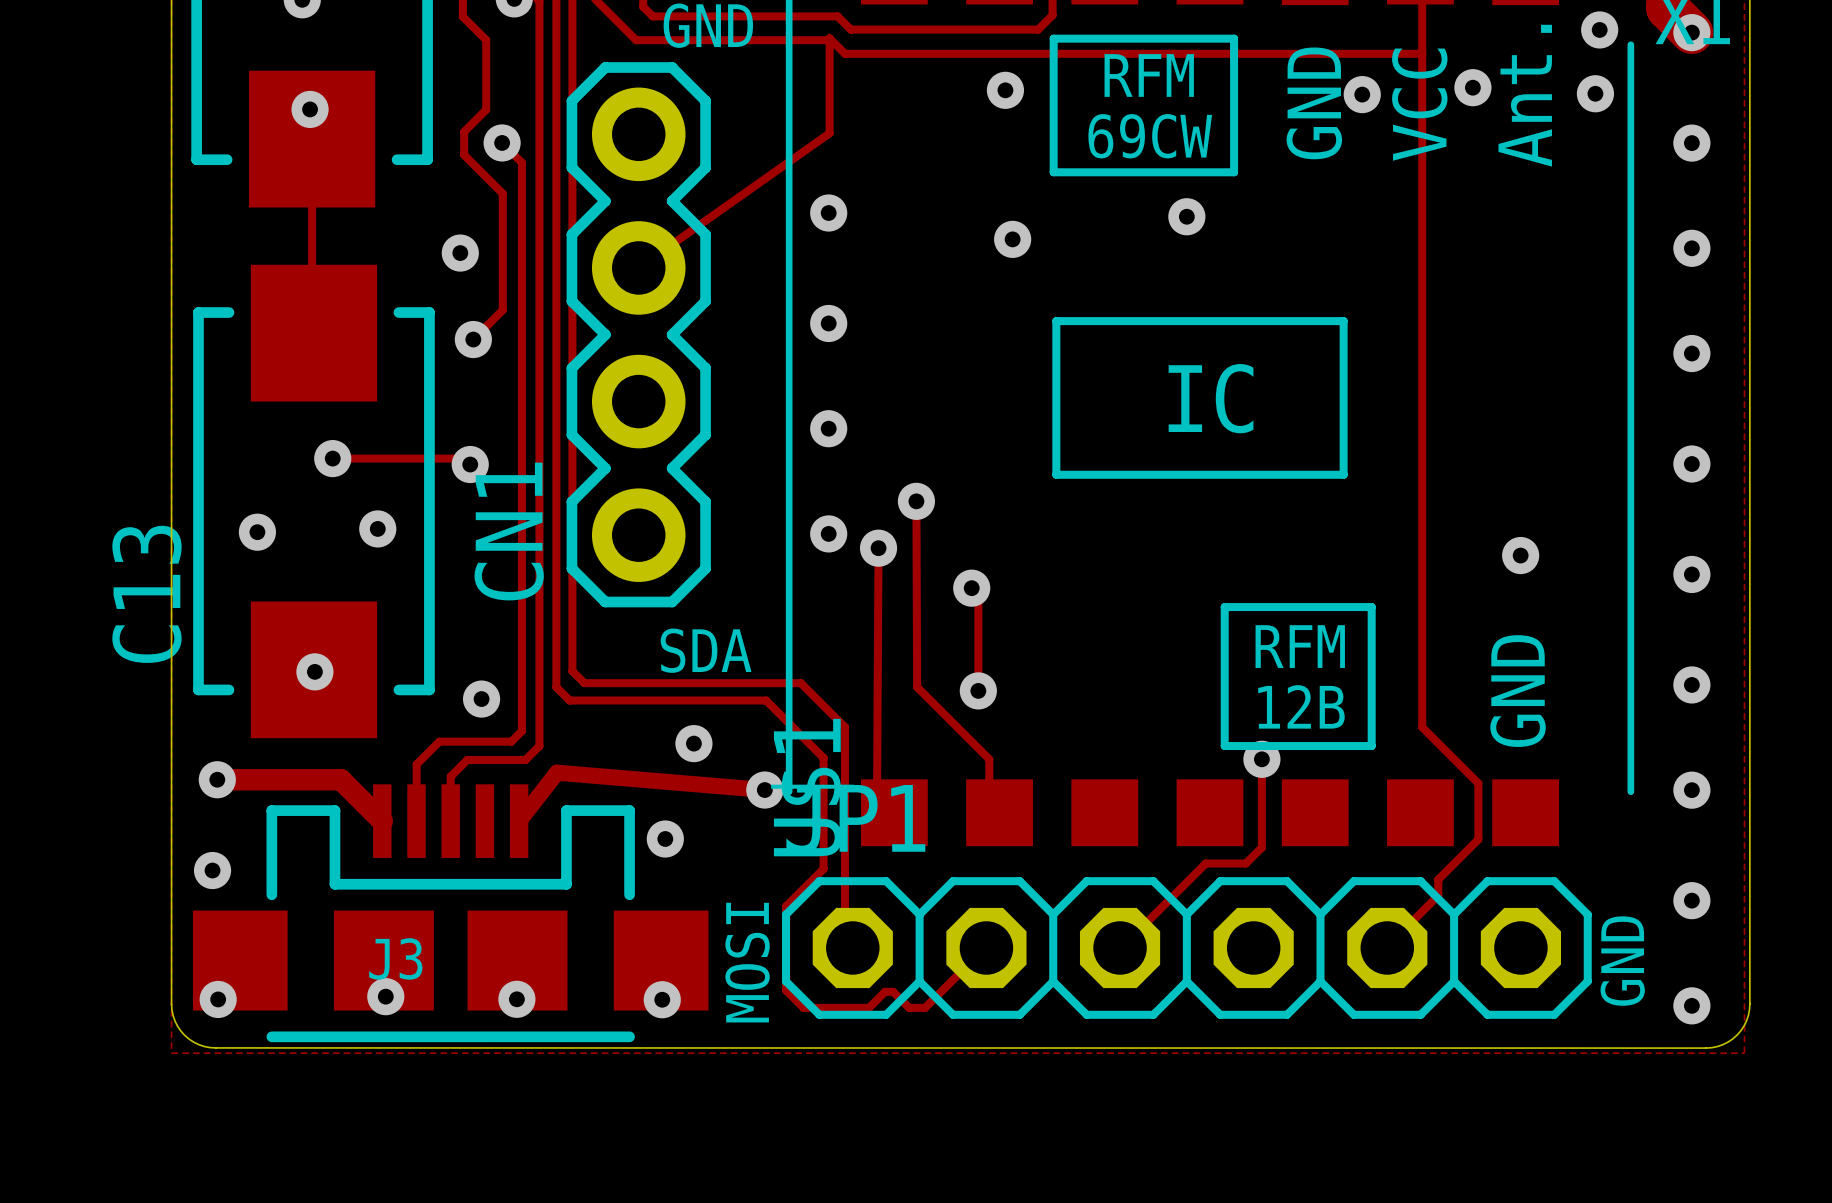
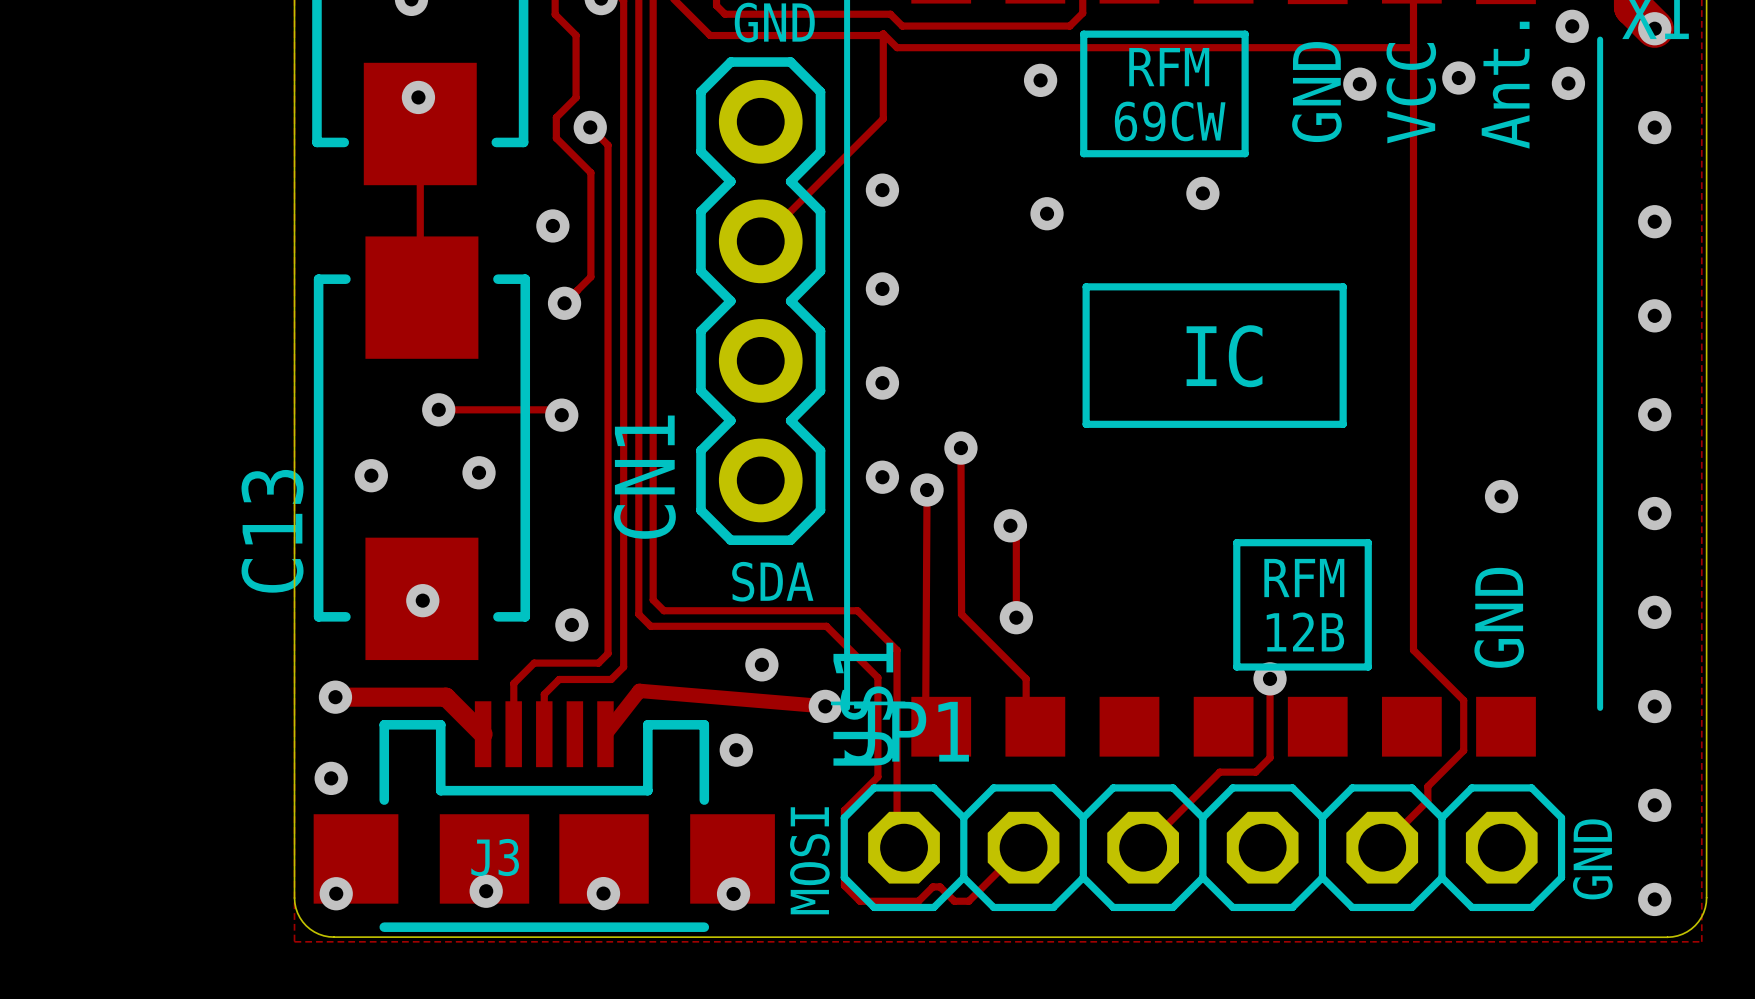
track: (829, 133) (638, 267) -> (883, 118) (760, 241)
CN1 position: (638, 334) -> (760, 301)

